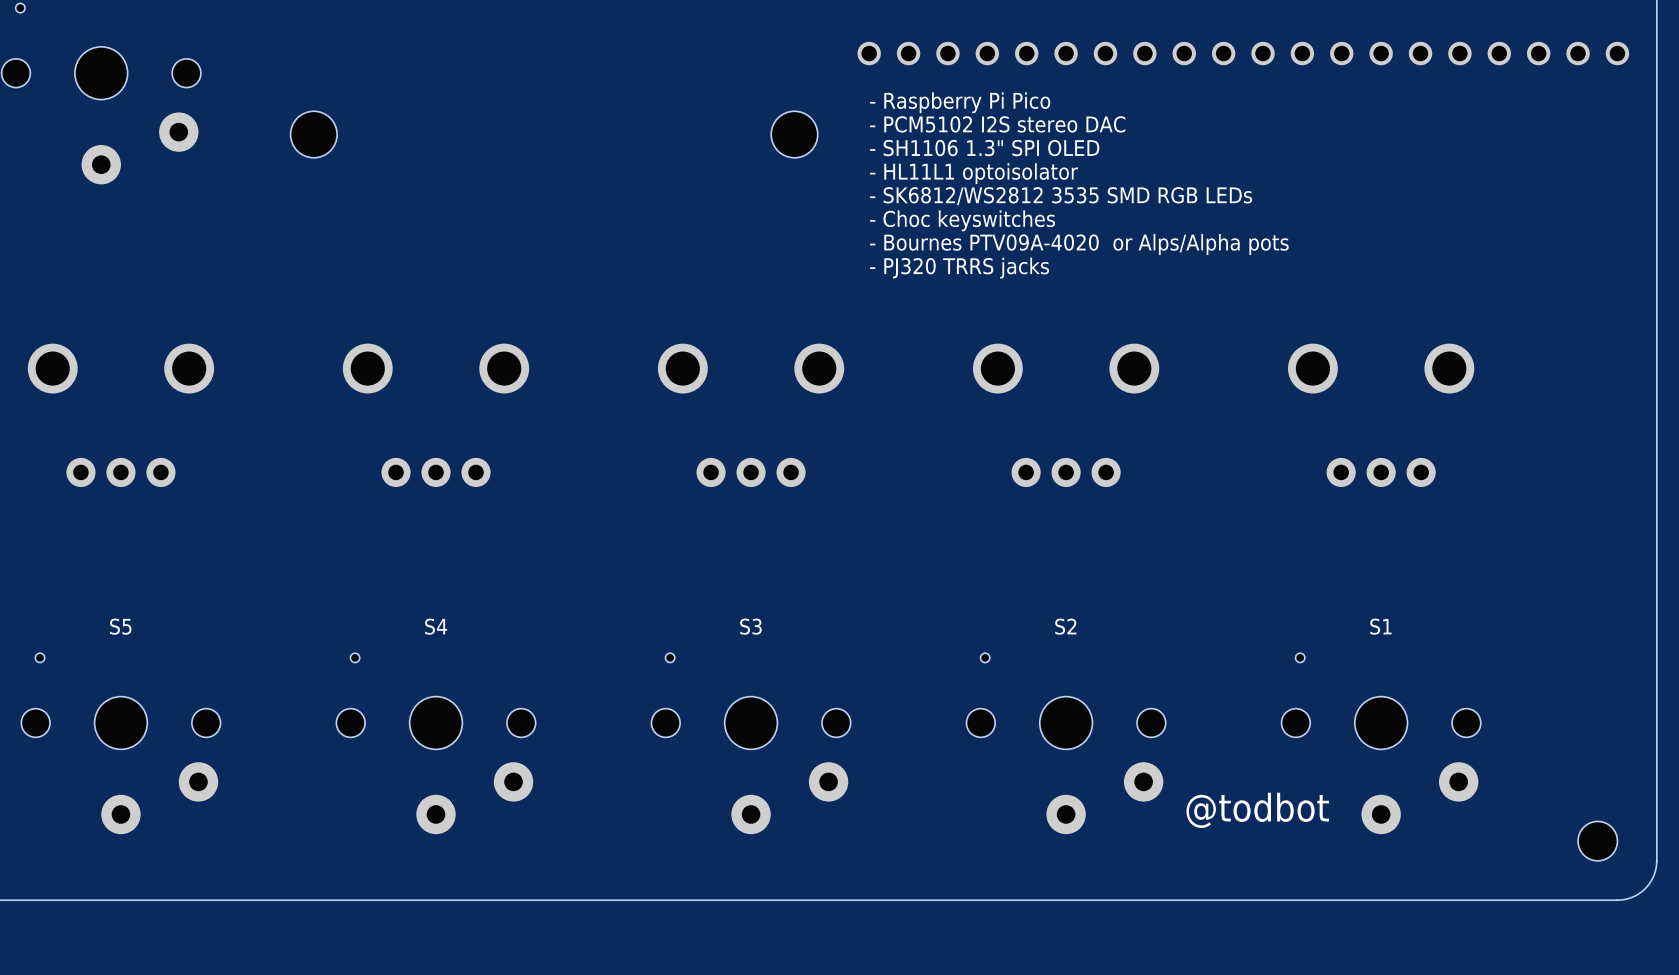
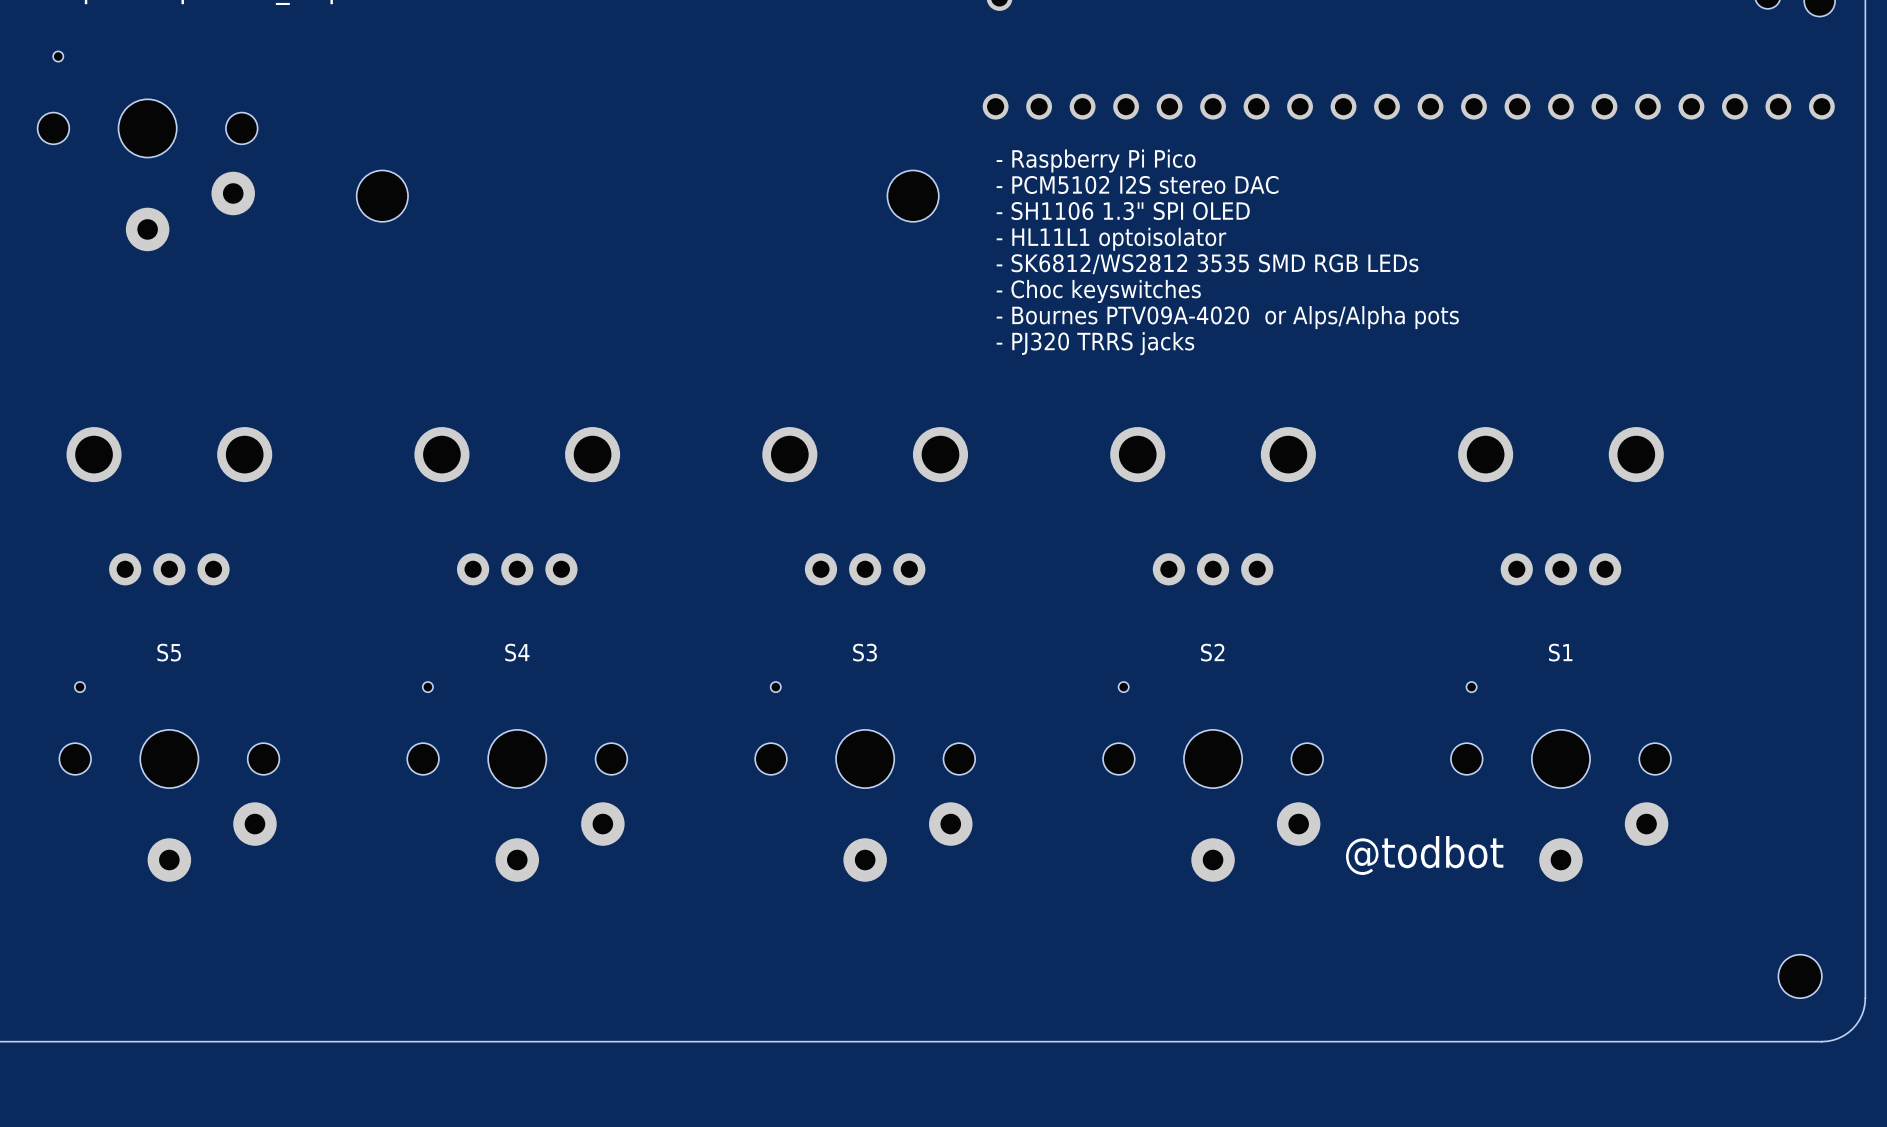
S5 position: (120, 743) -> (169, 781)
S4 position: (436, 743) -> (517, 781)
S3 position: (751, 743) -> (865, 781)
S2 position: (1066, 743) -> (1213, 781)
S1 position: (1381, 743) -> (1560, 781)
text position: @todbot (1257, 810) -> @todbot (1424, 855)

